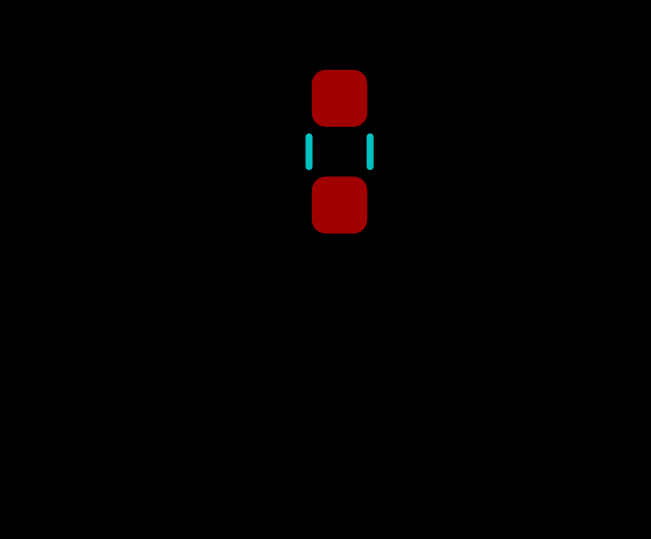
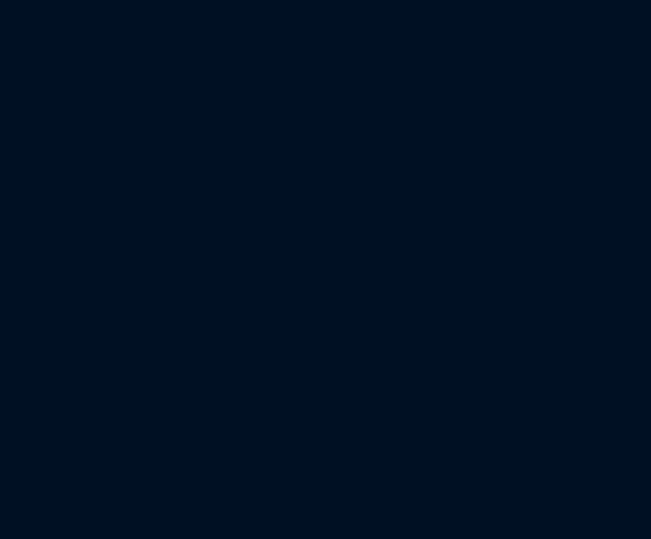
part: (339, 151) -> none

